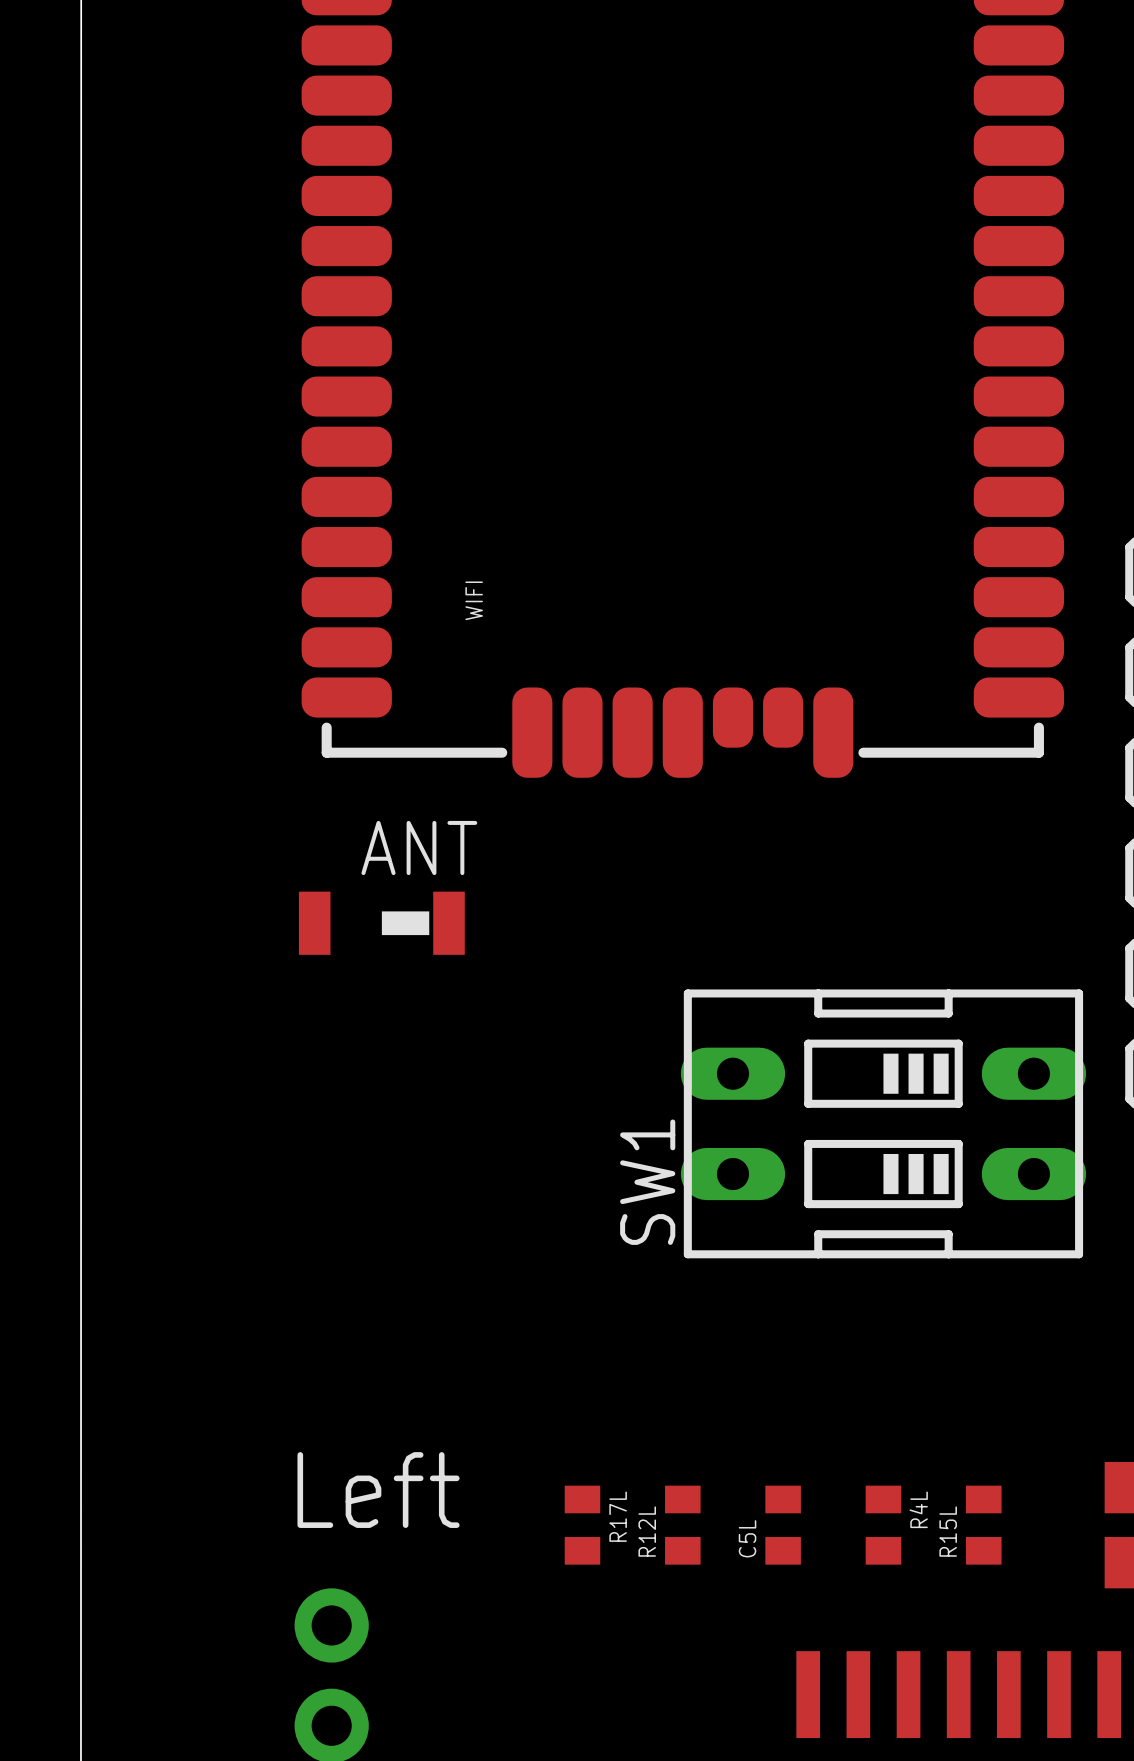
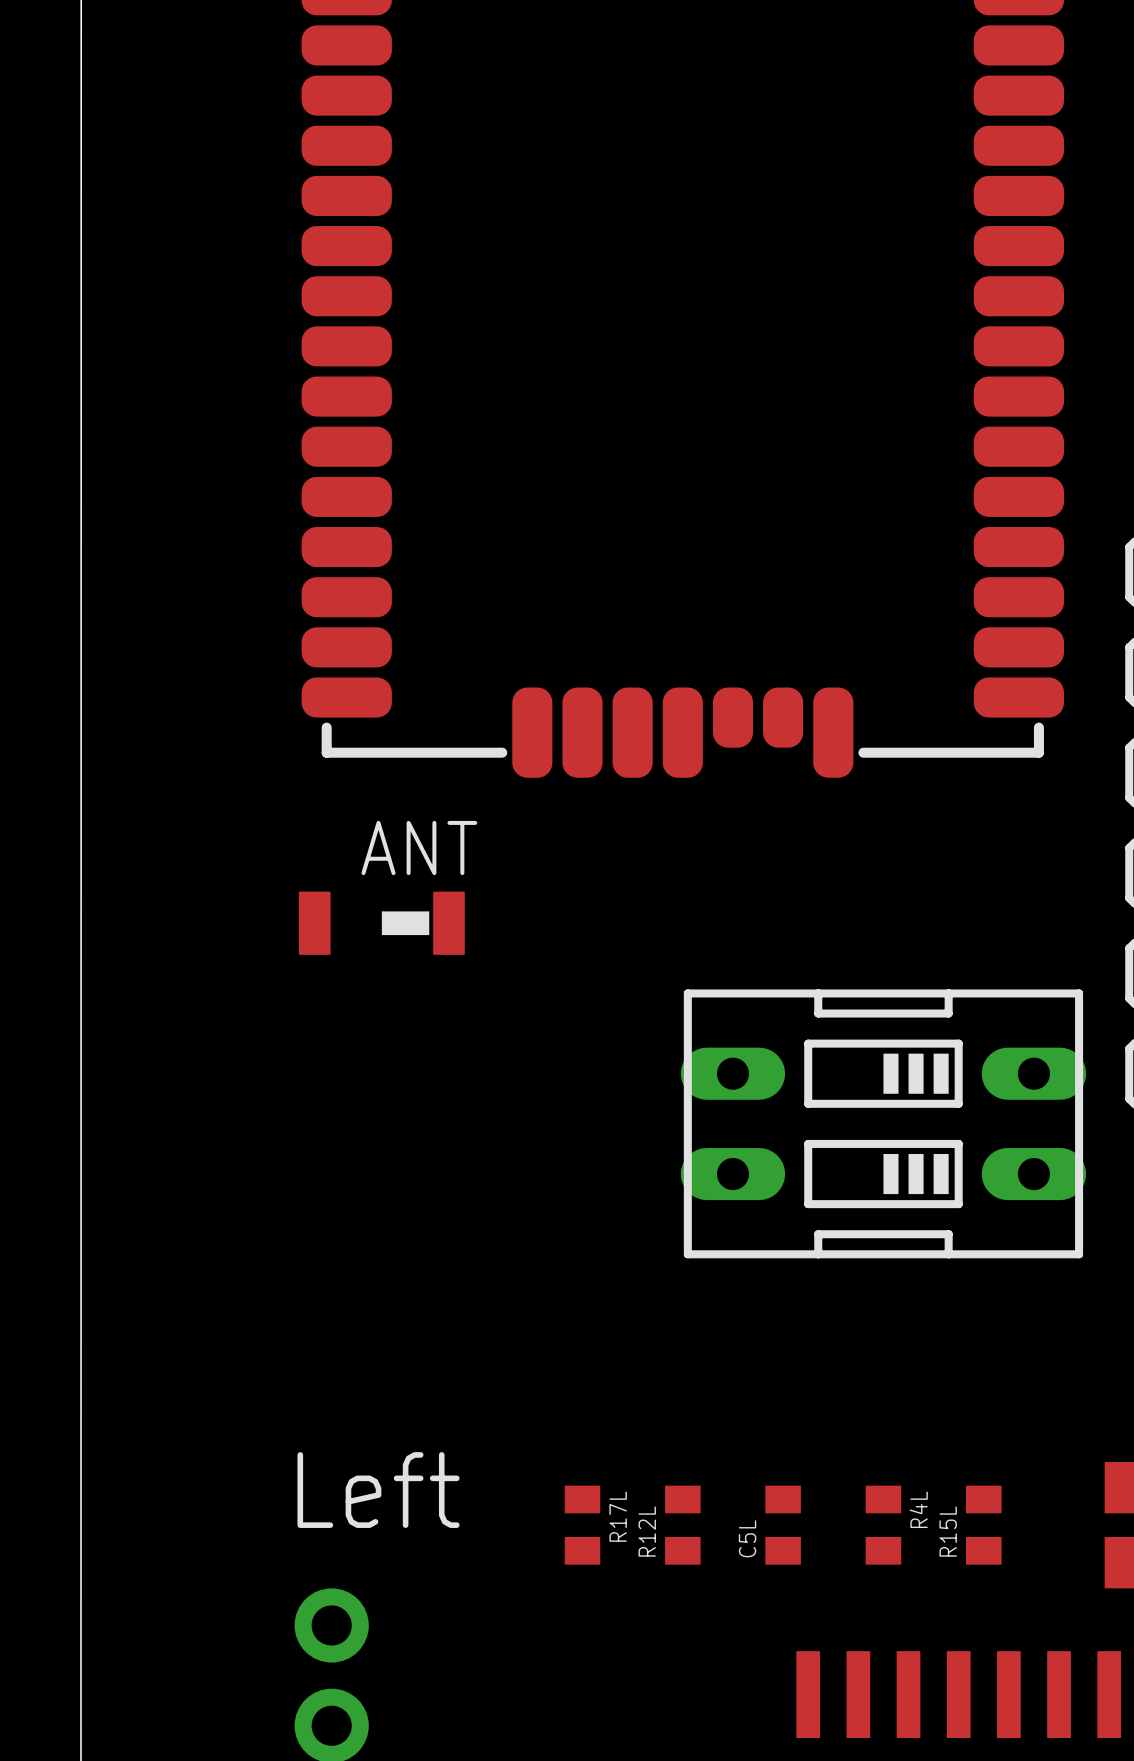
WIFI name: WIFI (474, 600) -> none
SW1 name: SW1 (647, 1182) -> none

